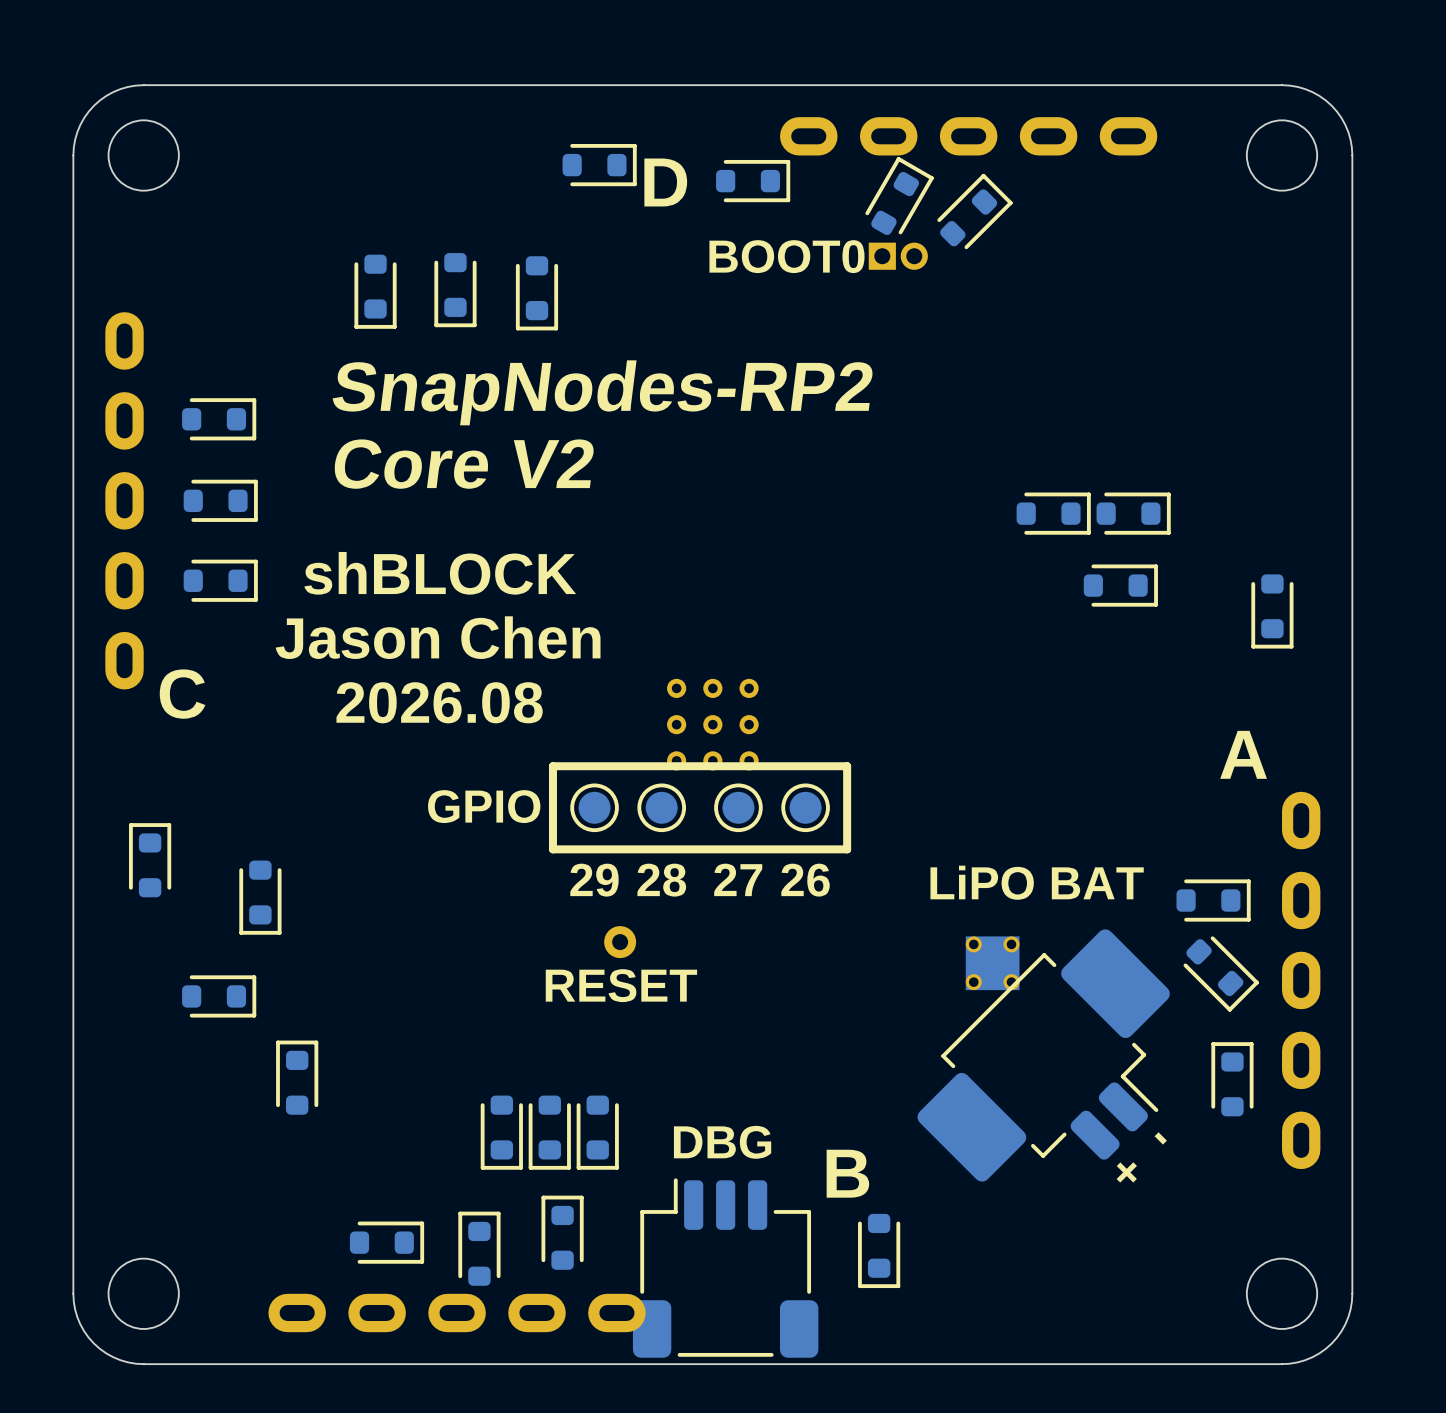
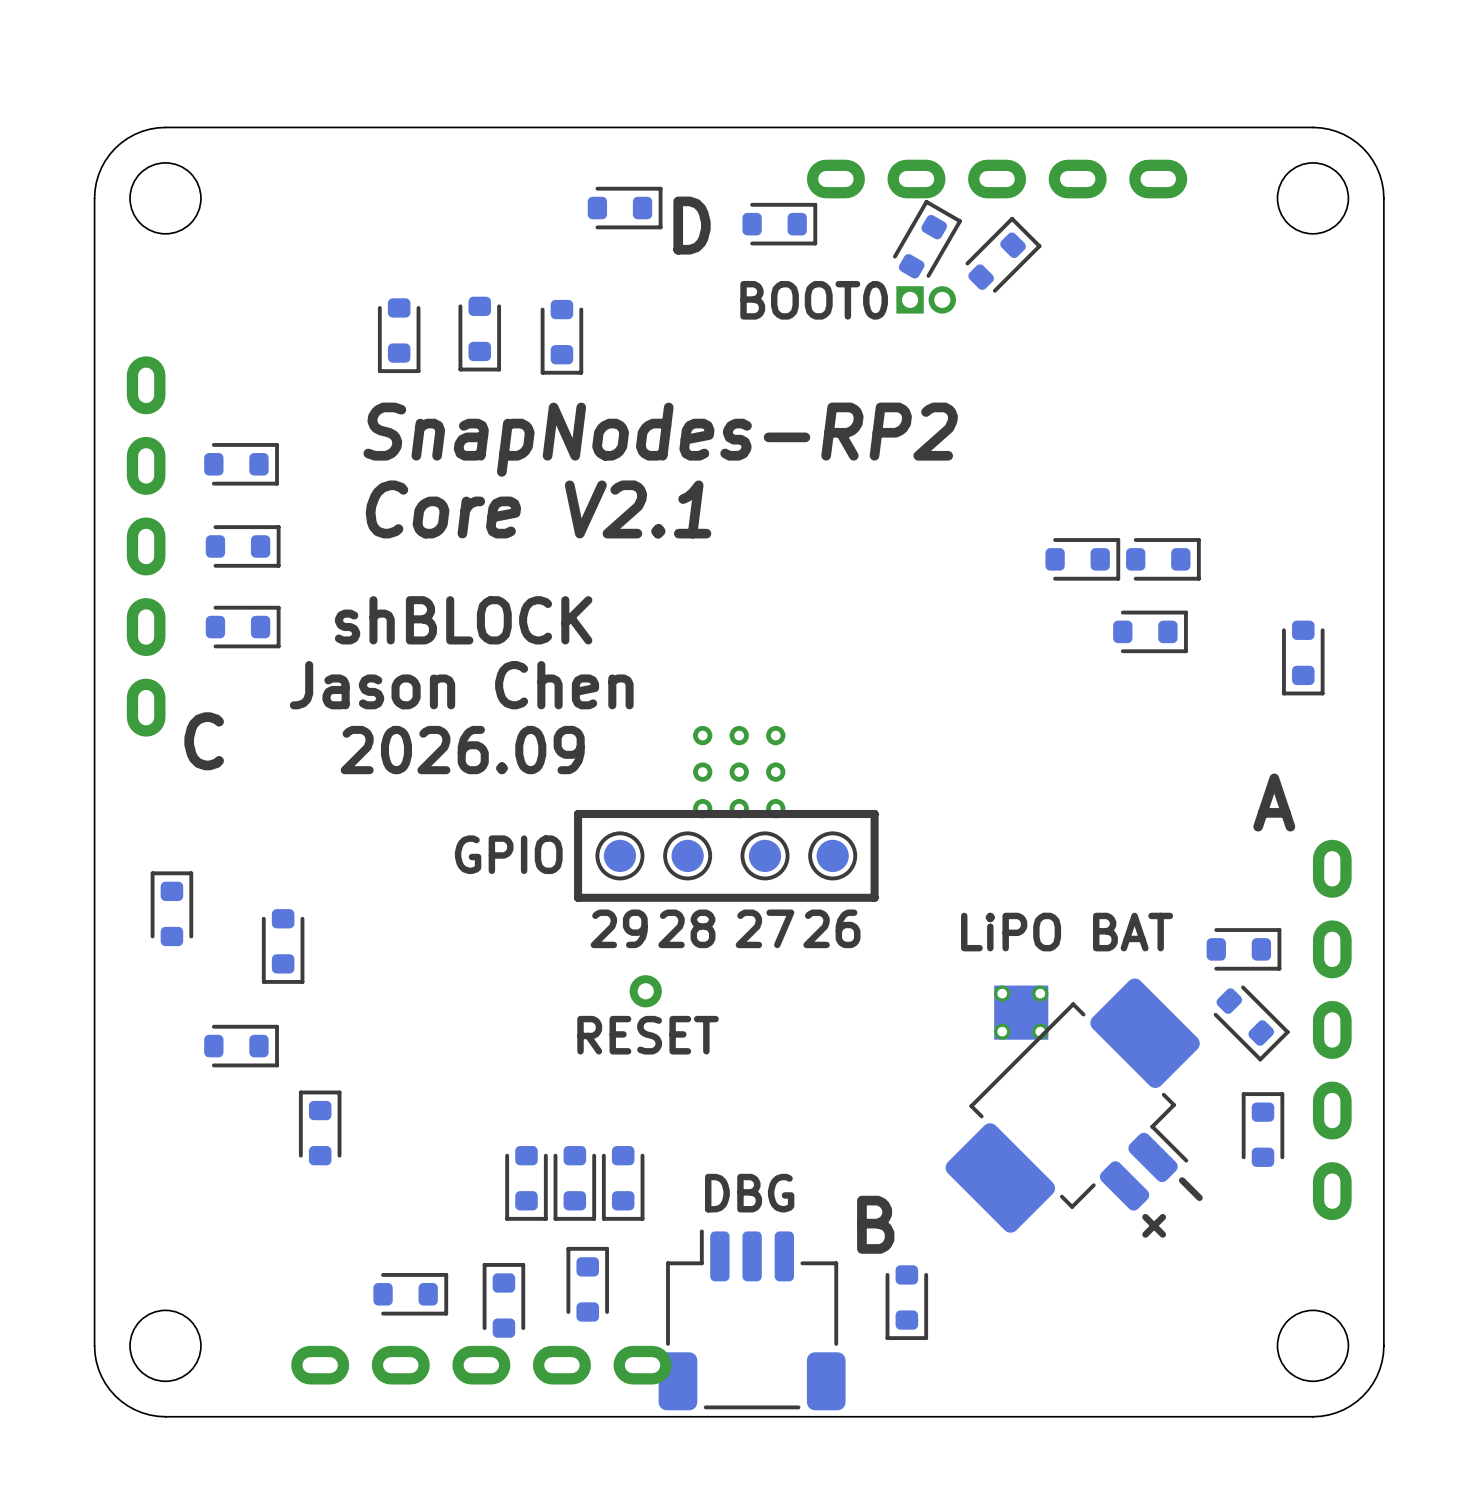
text: Core V2 (463, 464) -> Core V2.1 (538, 509)
text: 2026.08 (439, 702) -> 2026.09 (462, 750)

